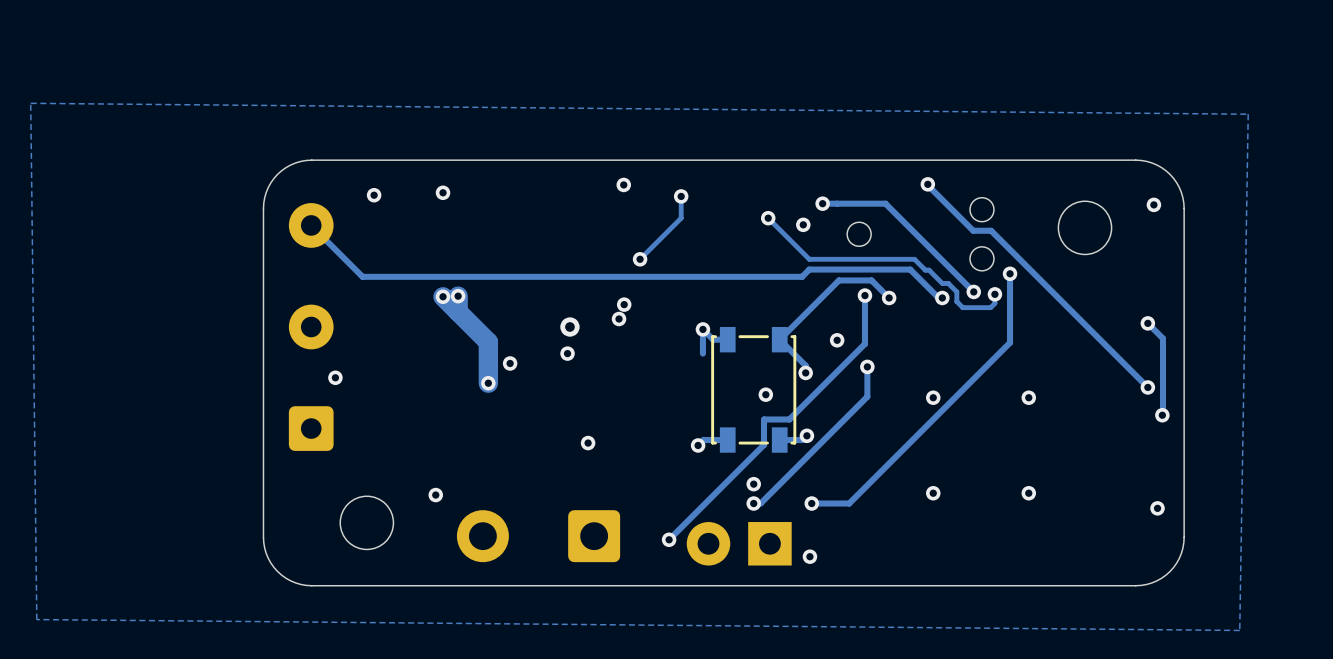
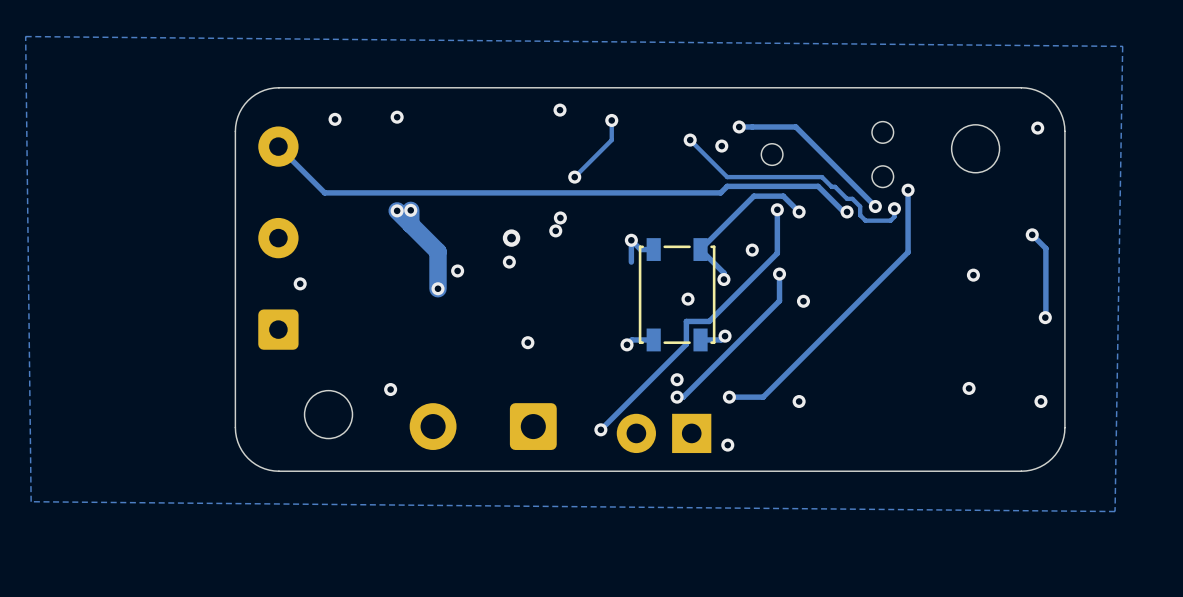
track: (927, 184) (973, 230) (991, 230) (1147, 387) -> none
via: (927, 184) -> none
via: none -> (973, 275)
via: (1147, 387) -> none
via position: (933, 397) -> (803, 301)
via: (1028, 397) -> none
via position: (933, 493) -> (799, 401)
via position: (1028, 493) -> (969, 388)

